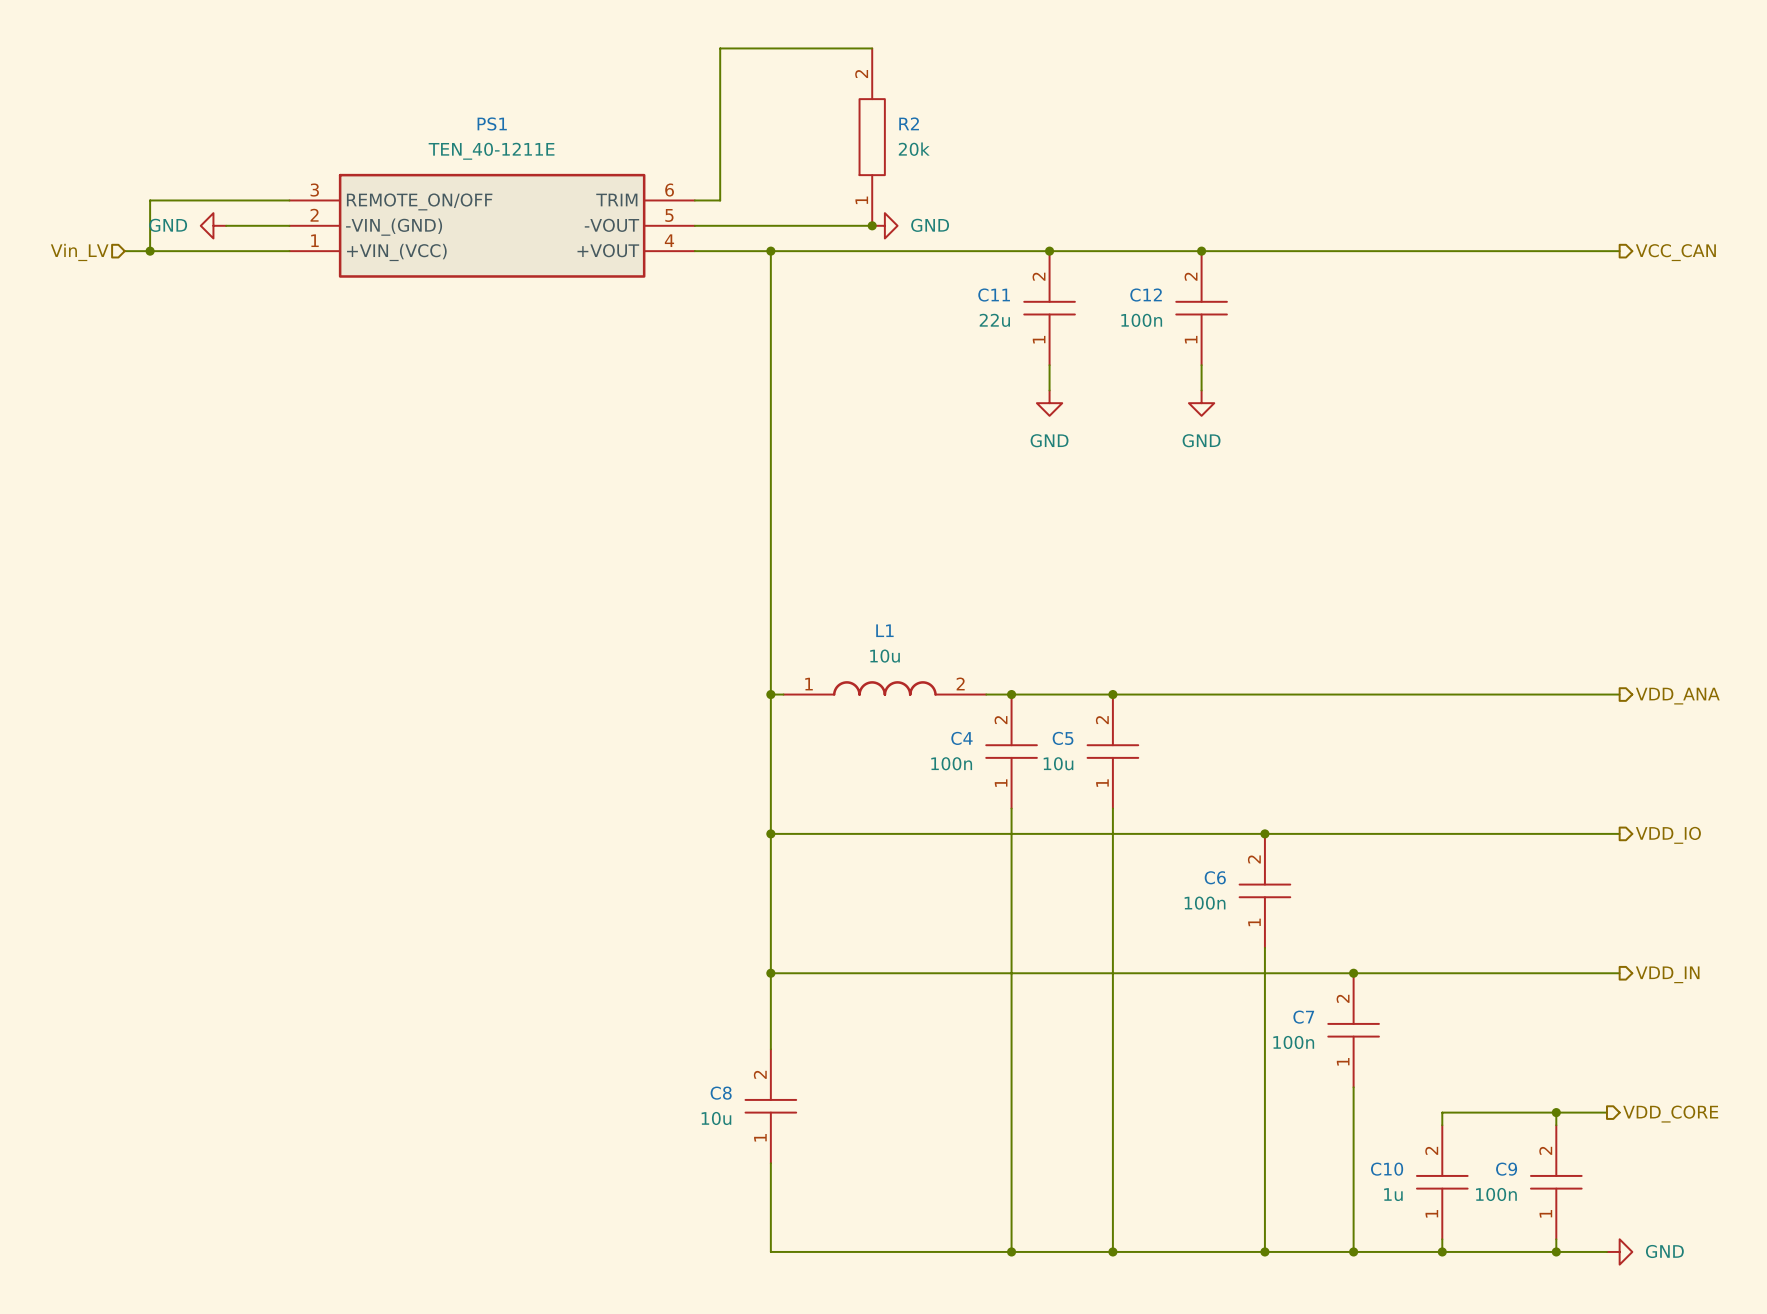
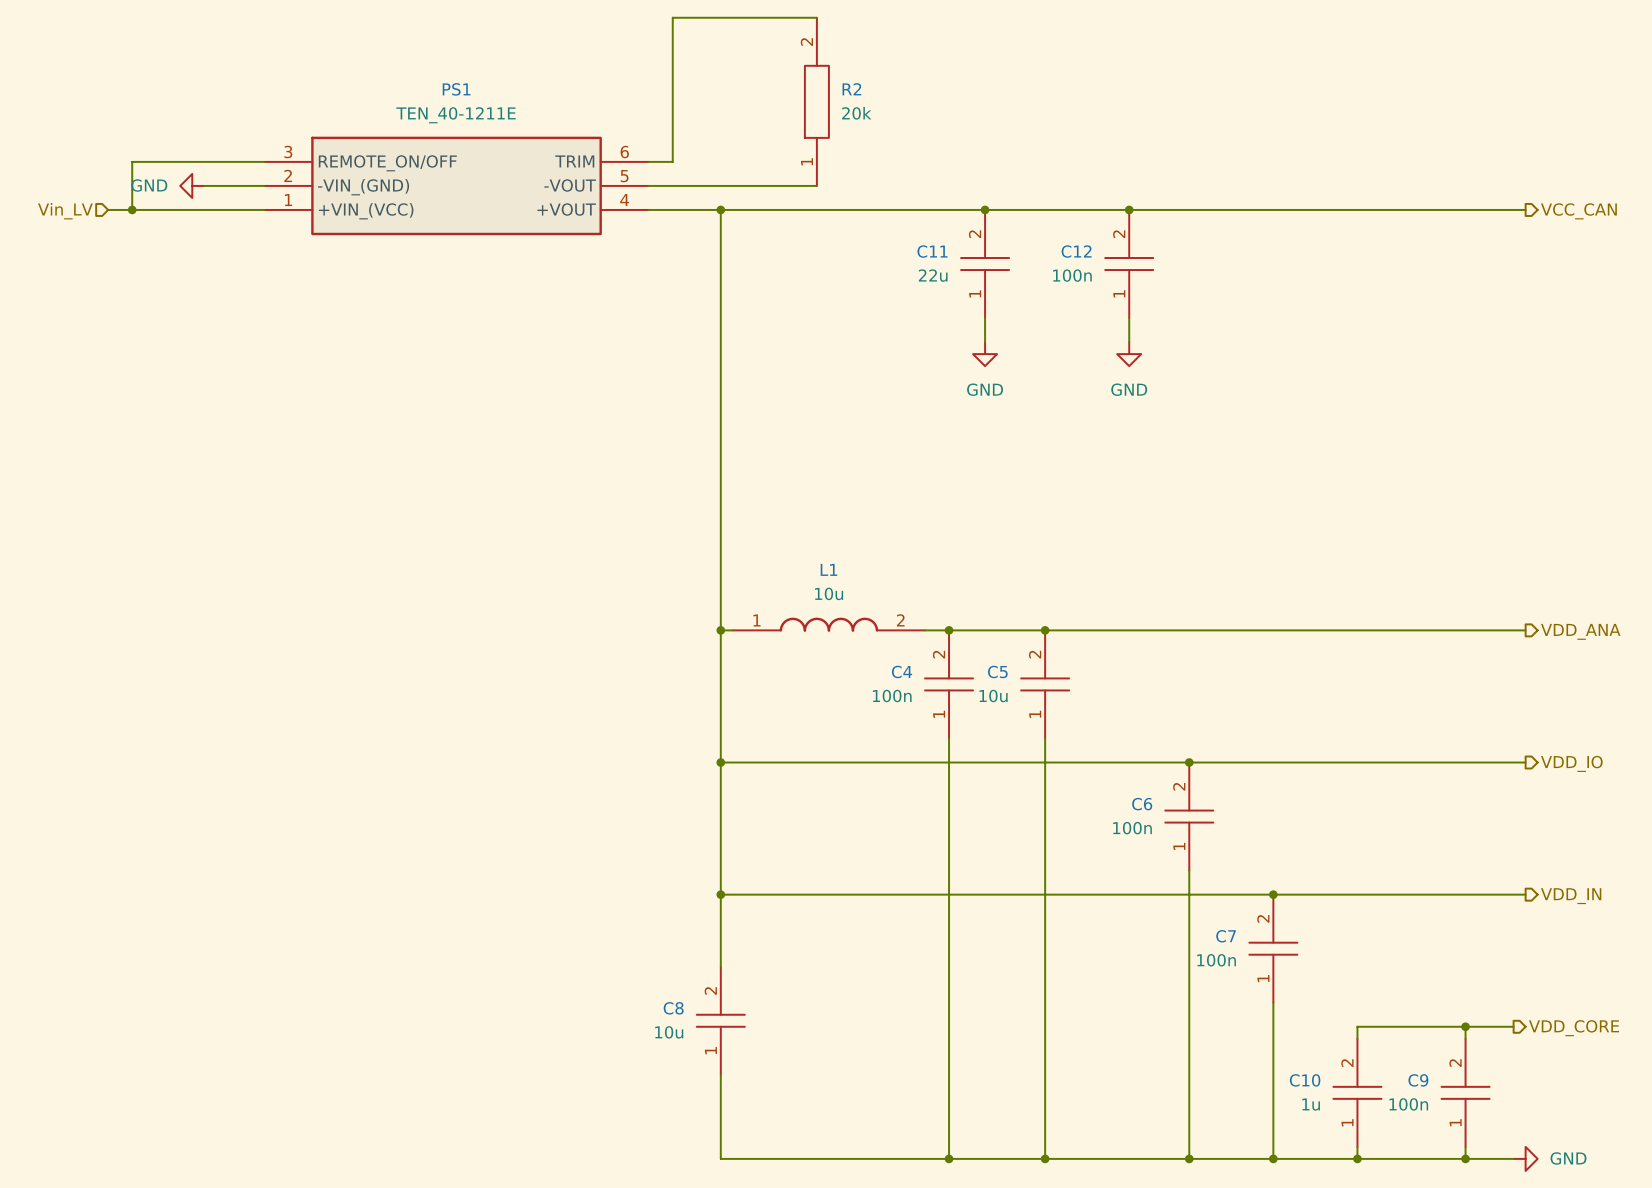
junction: (872, 225) -> none
power symbol: GND (884, 225) -> none

